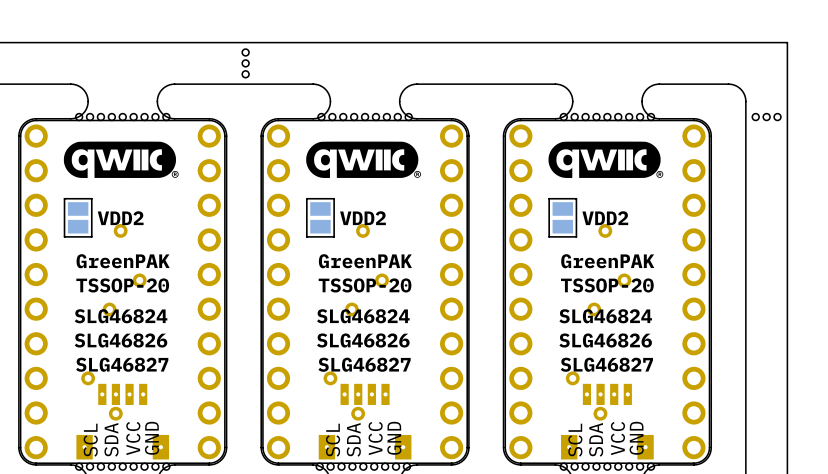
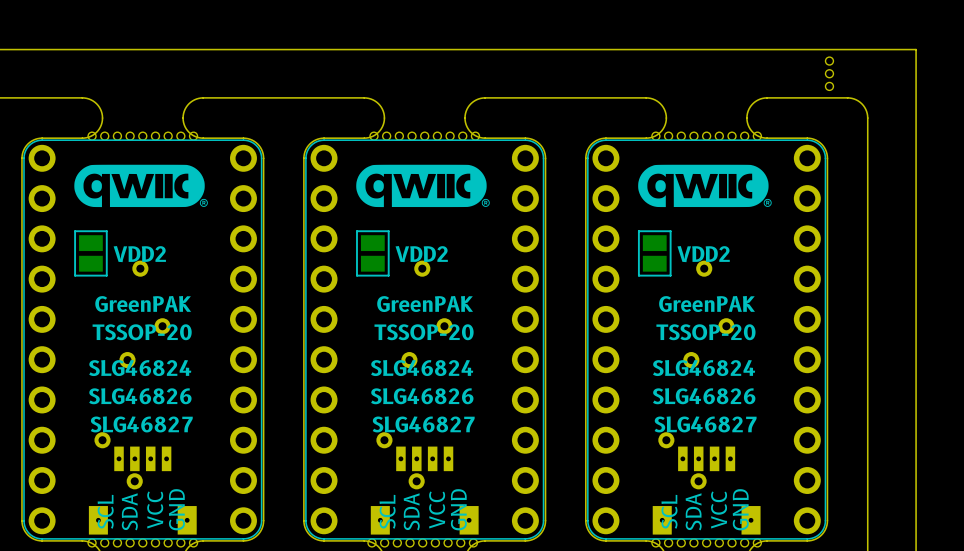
part: (245, 63) -> none
part rotation: 0° (766, 117) -> 90° clockwise (829, 73)
part position: (766, 117) -> (829, 73)

